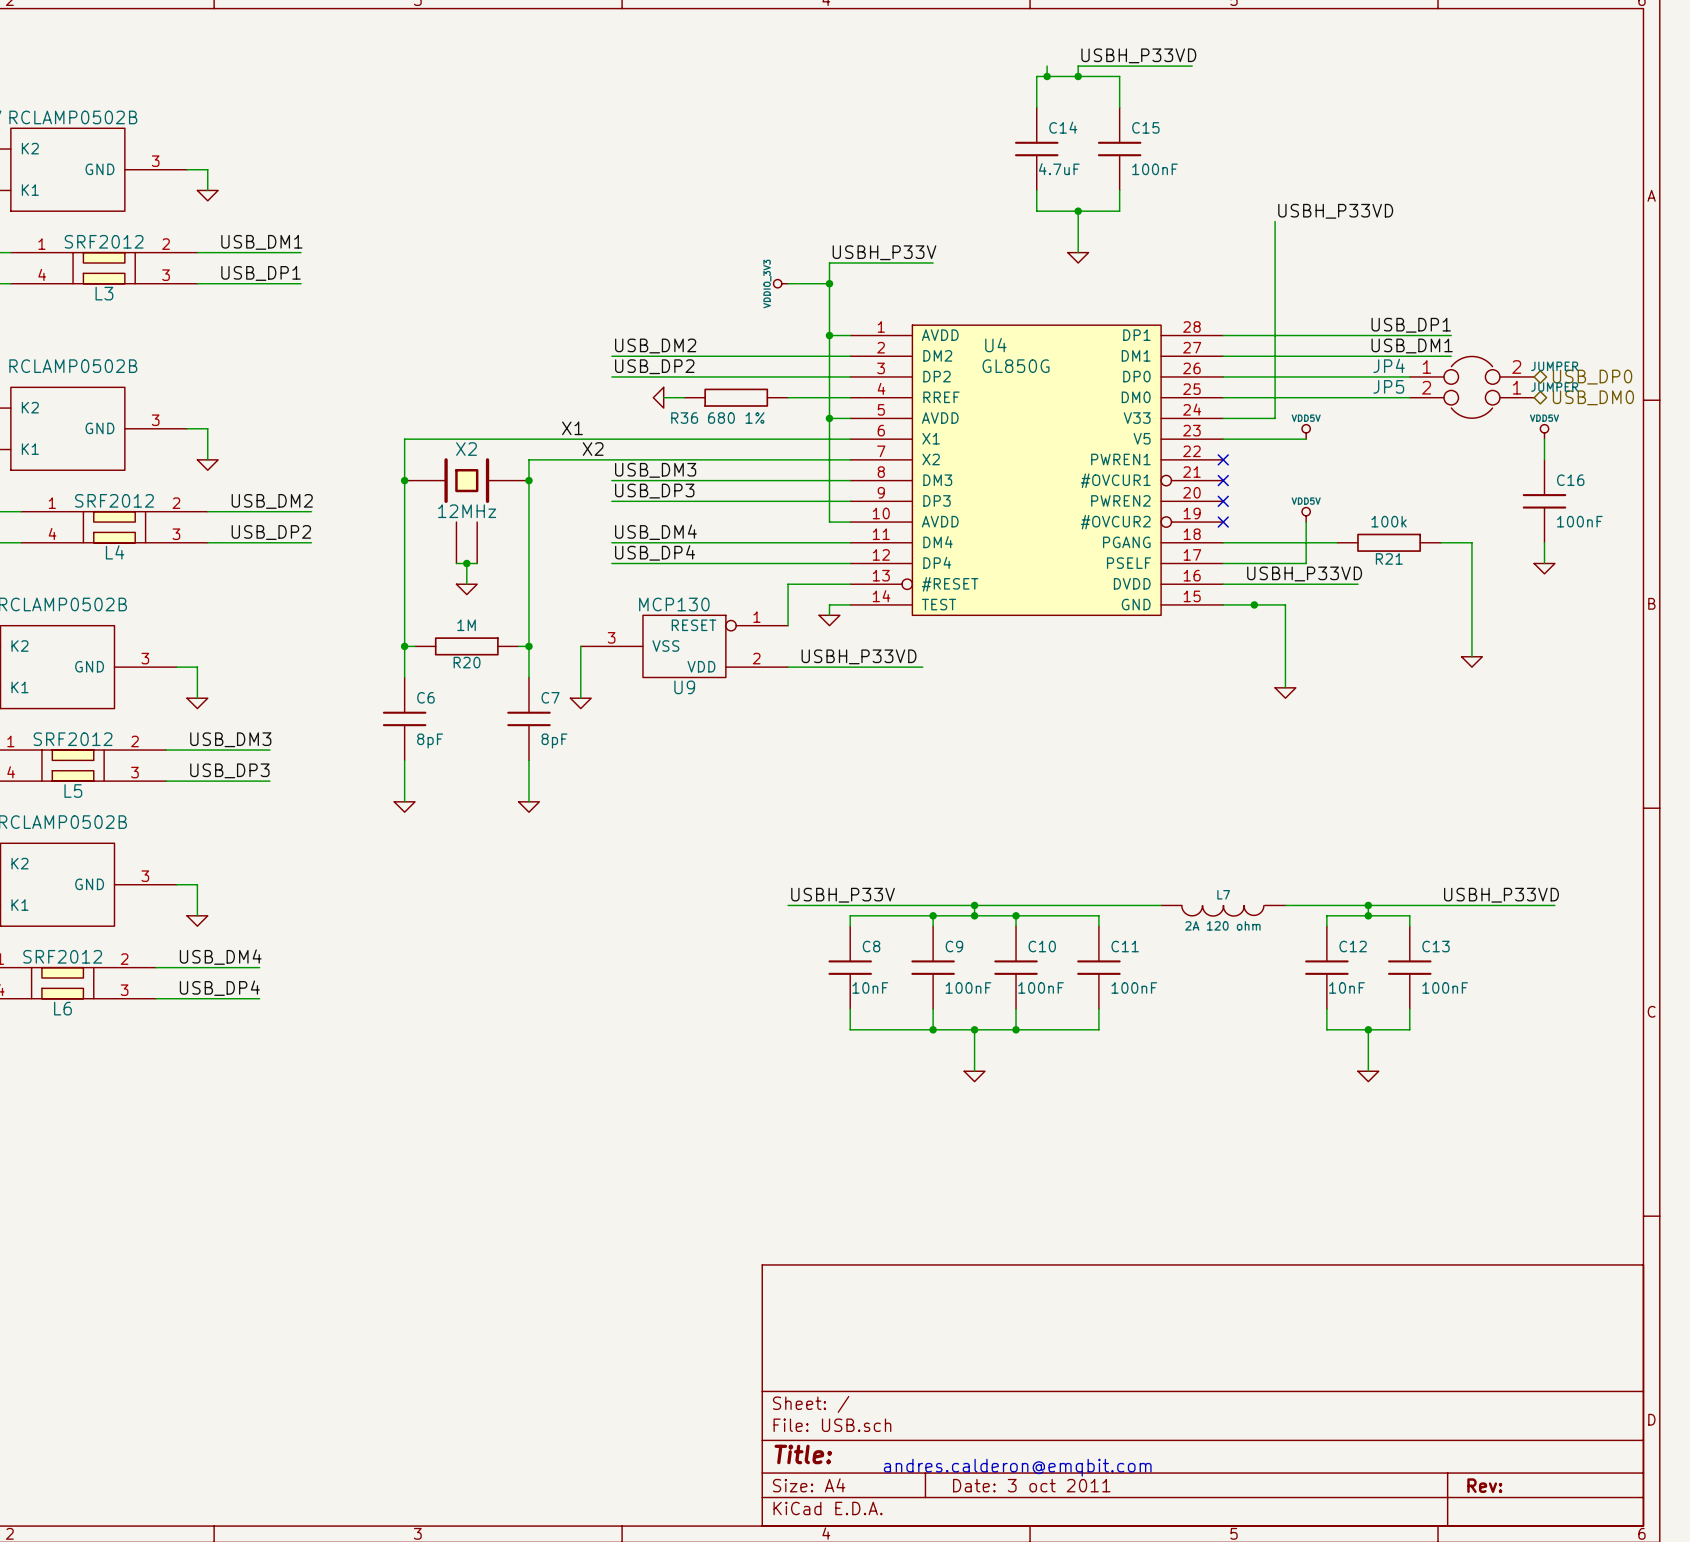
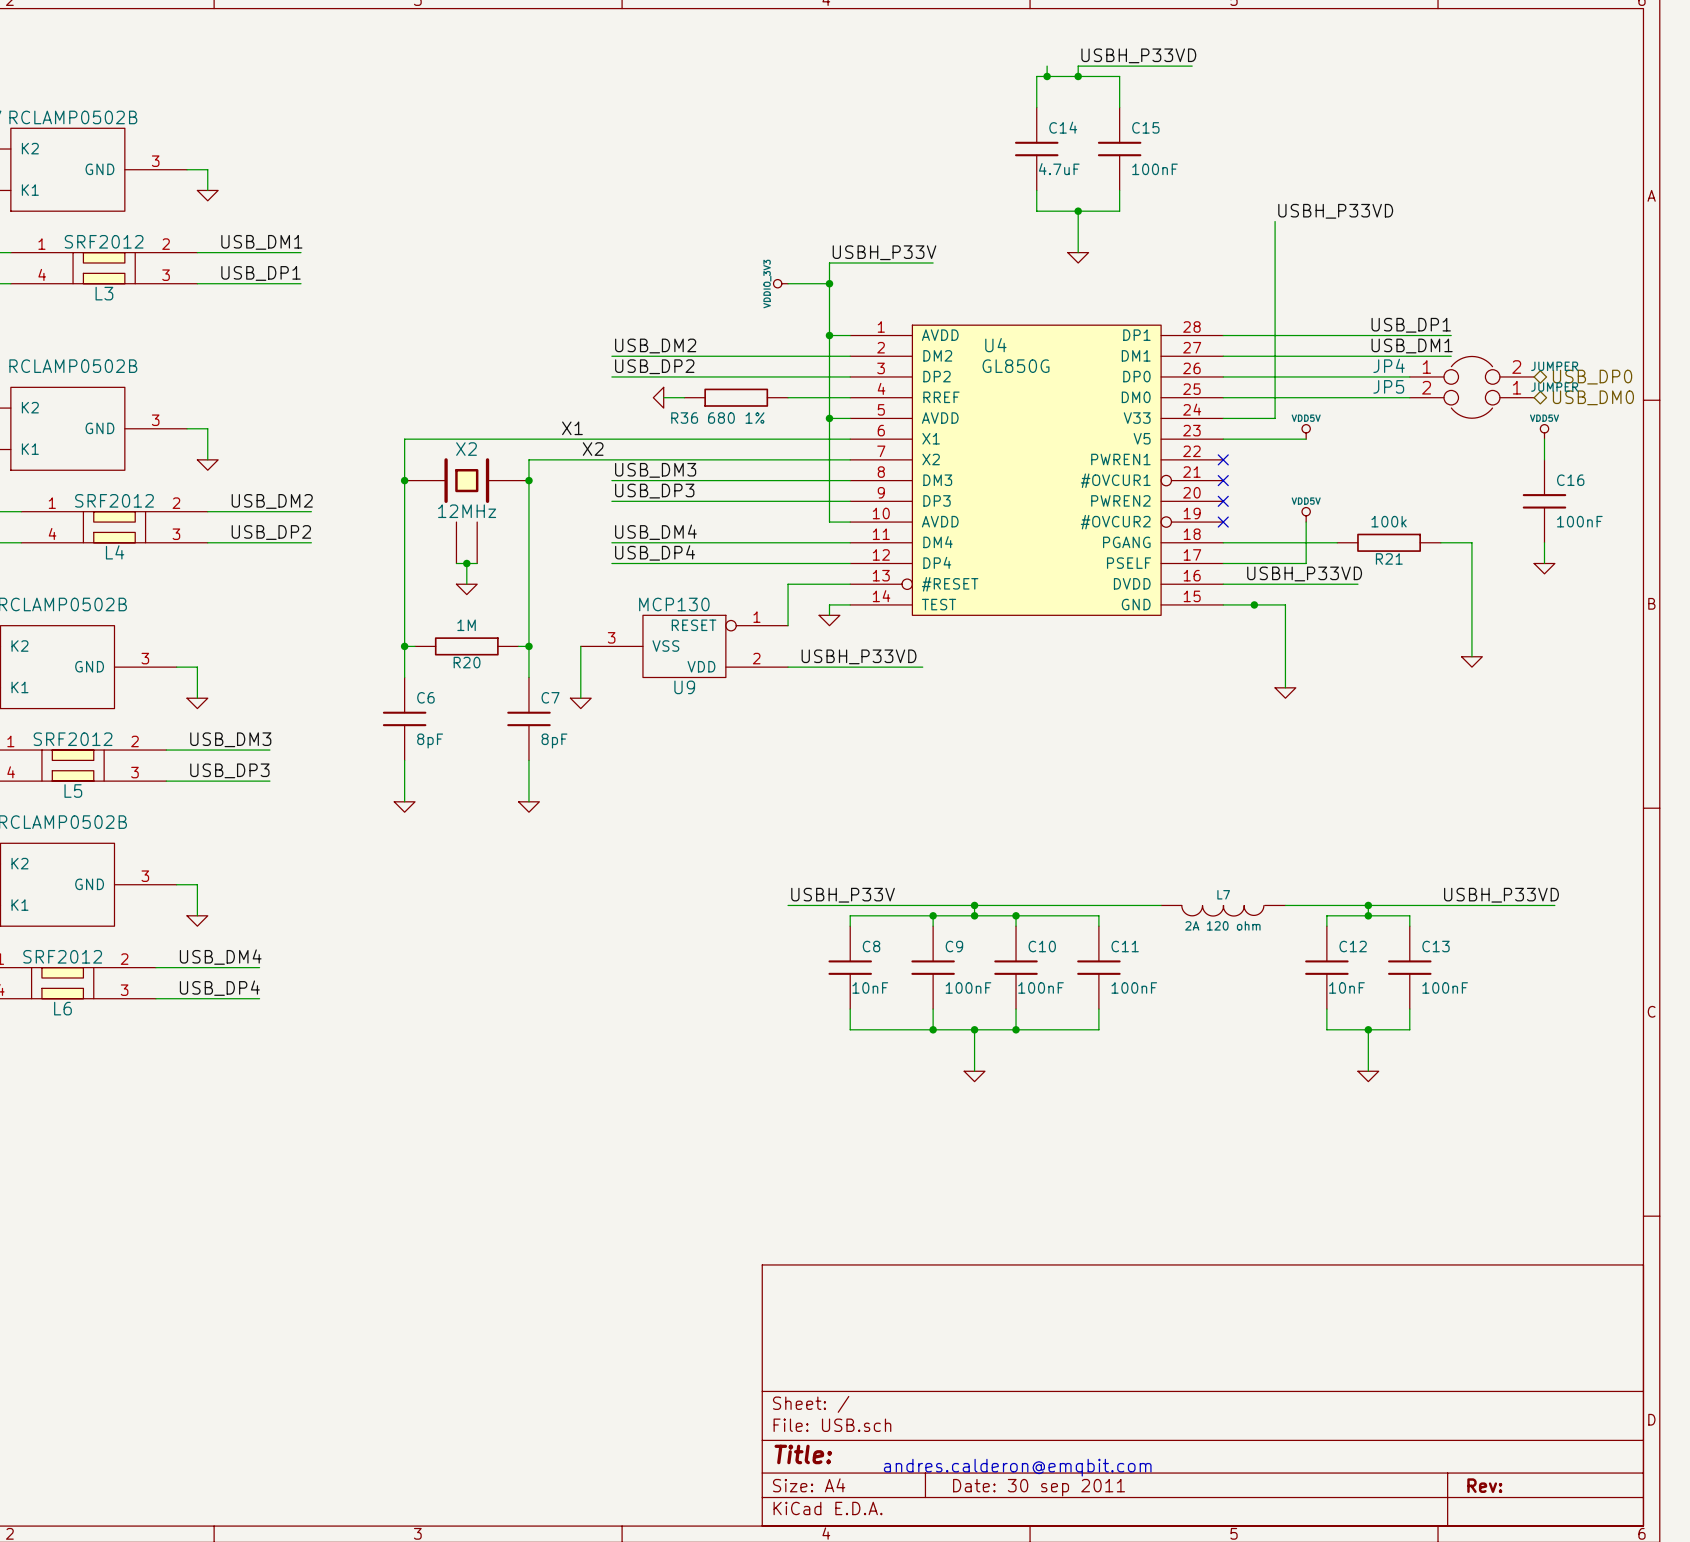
title block: Date: 3 oct 2011 (1031, 1485) -> Date: 30 sep 2011 (1039, 1487)

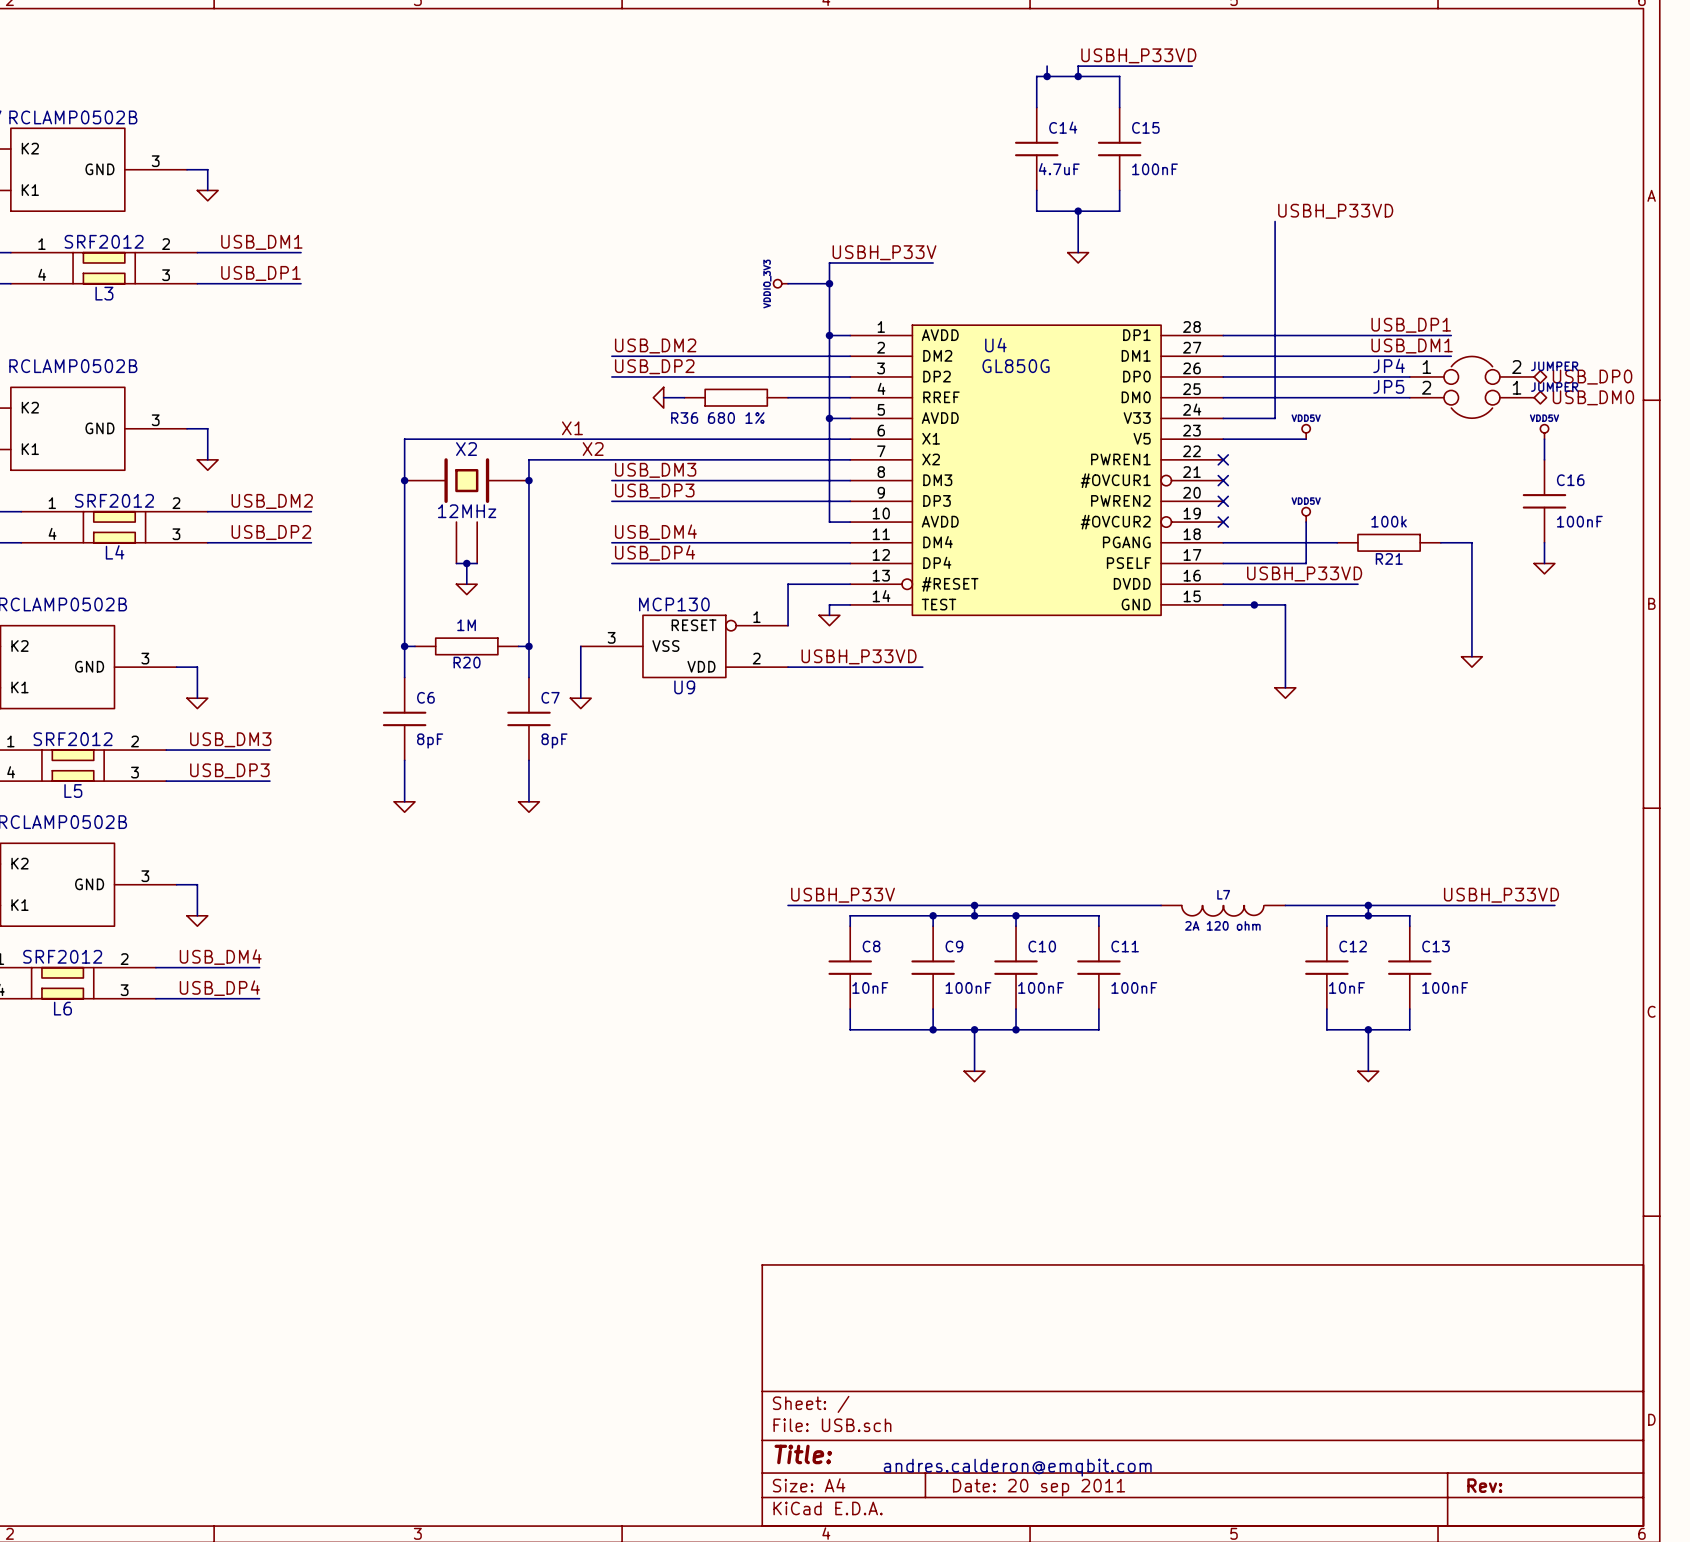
title block: Date: 30 sep 2011 (1039, 1487) -> Date: 20 sep 2011 (1039, 1487)

